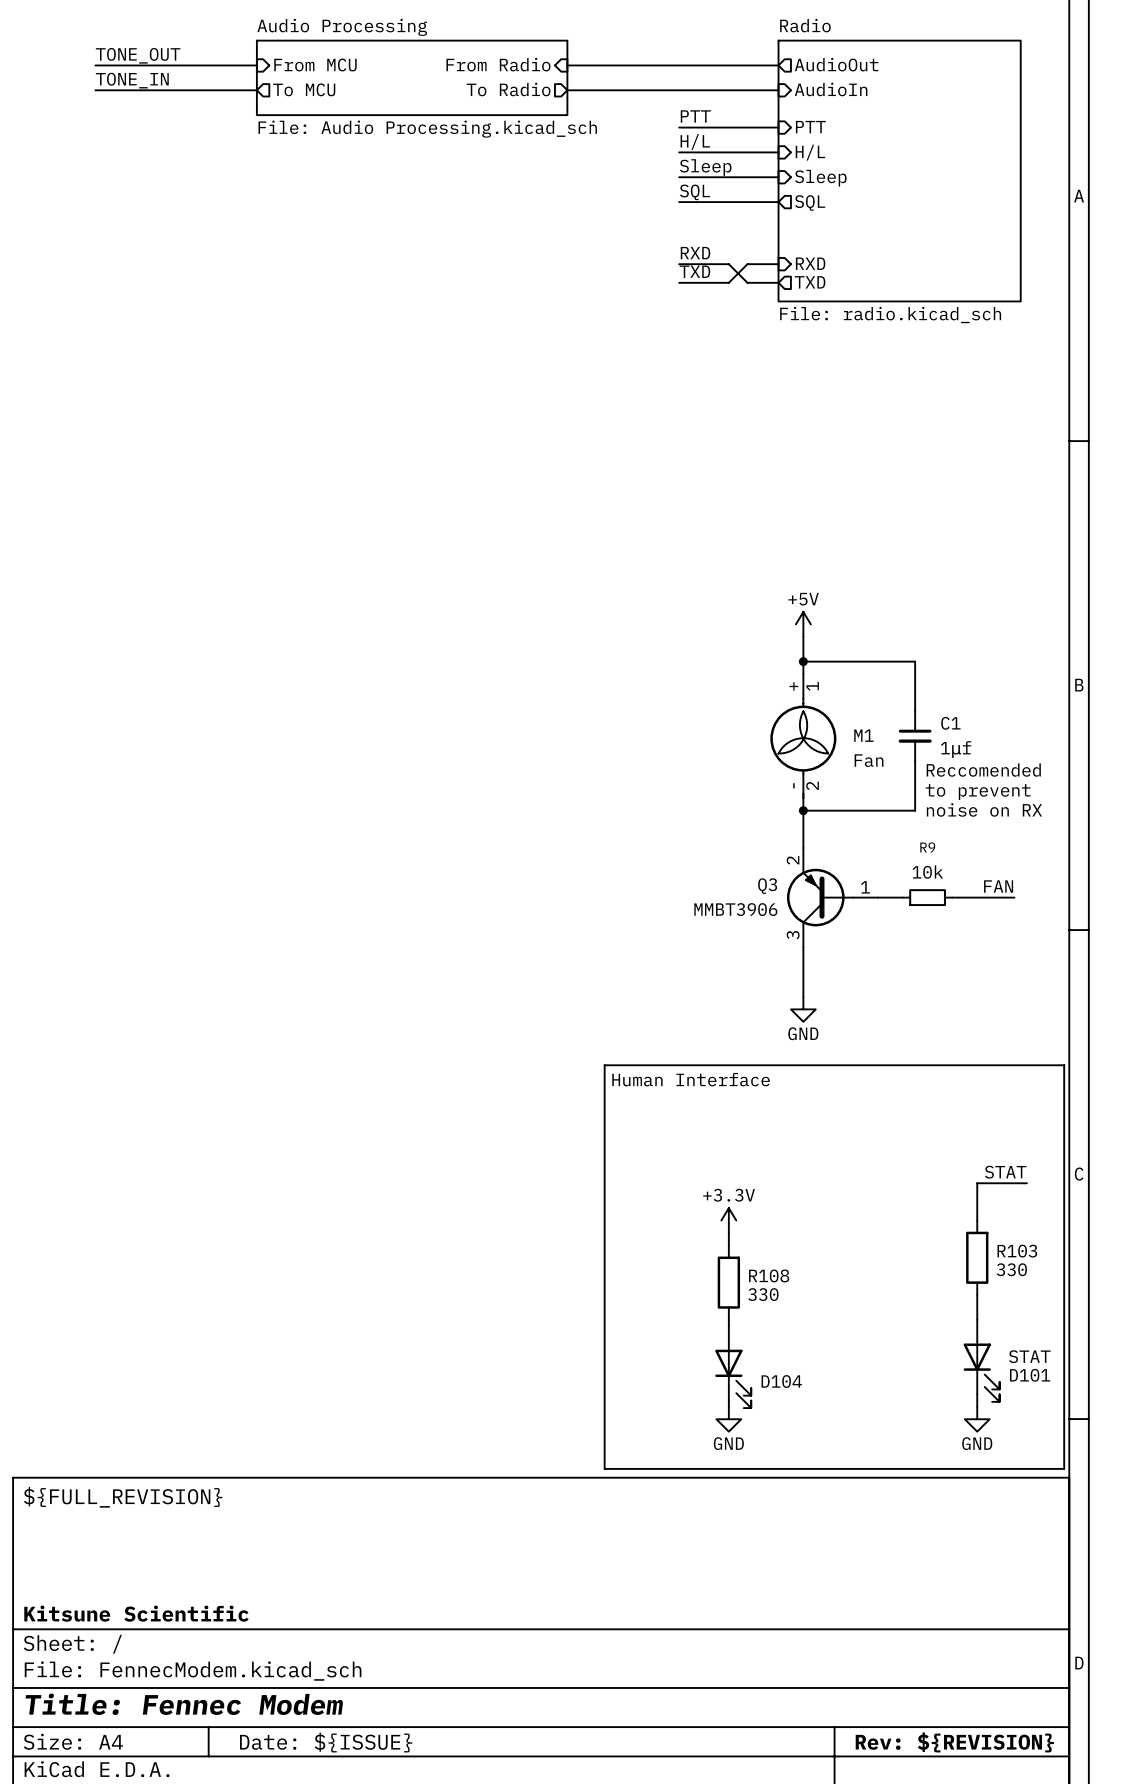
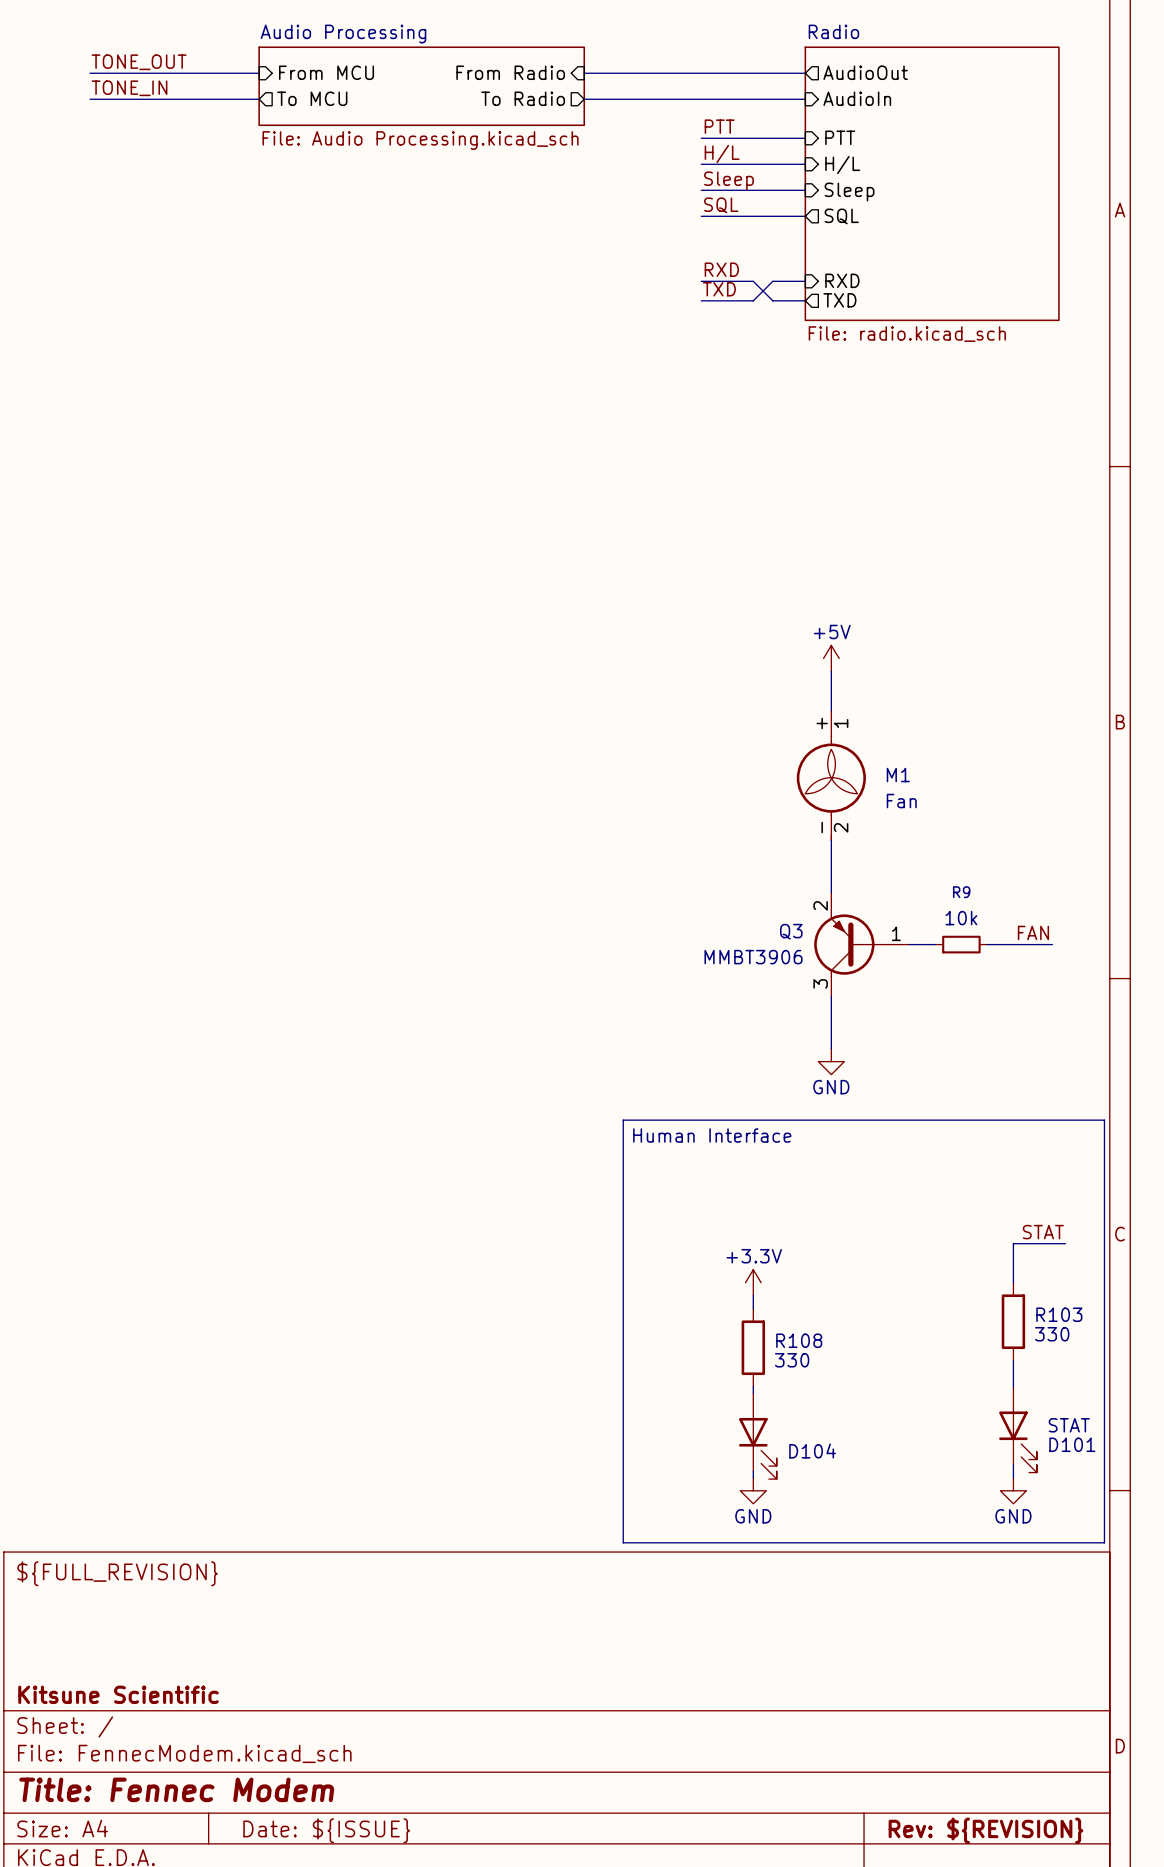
wire: (803, 661) (915, 661) (915, 711) -> none
junction: (803, 661) -> none
C1: 1μf (915, 736) -> none
wire: (915, 760) (915, 810) (803, 810) -> none
text: Reccomended (983, 770) -> none
text: to prevent (978, 792) -> none
text: noise on RX (984, 809) -> none
junction: (803, 810) -> none

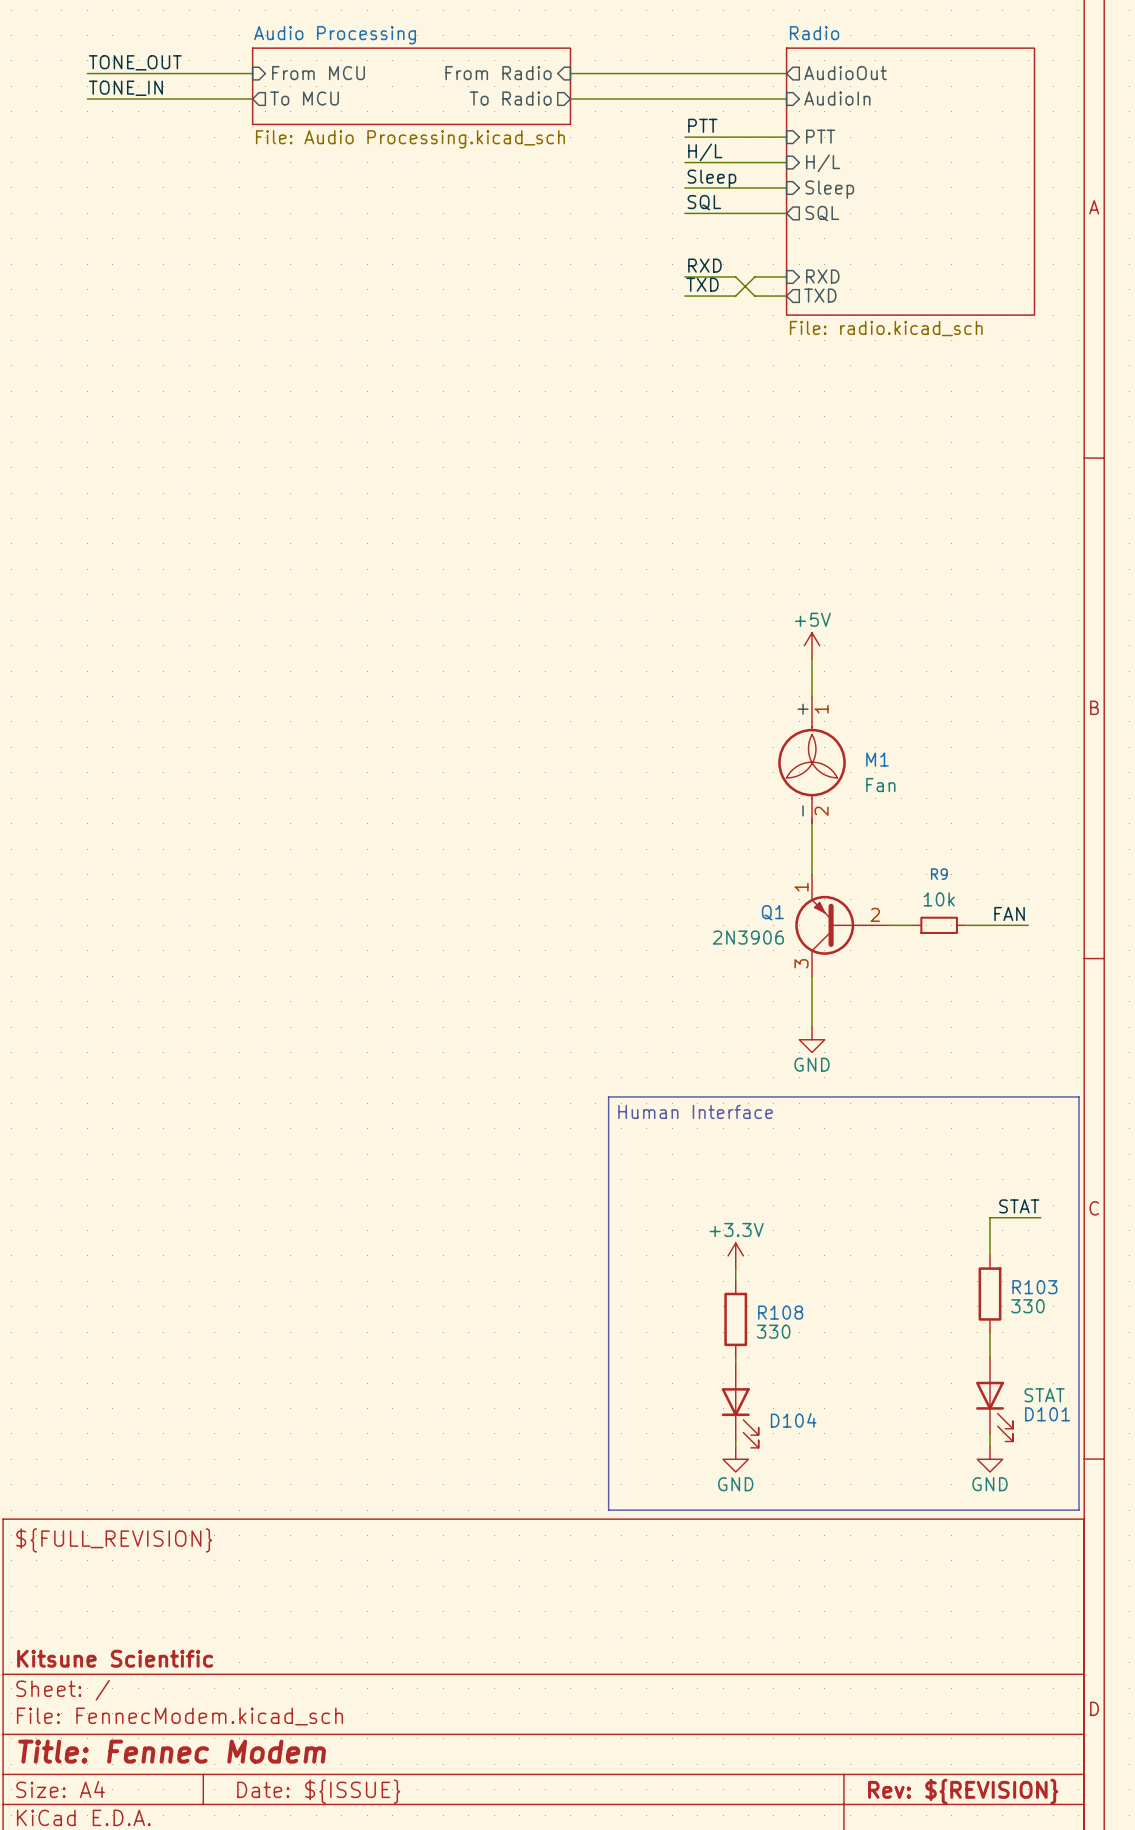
Q3 pin number: 2 (820, 905) -> 1 (801, 887)
Q3 name: Q3 (791, 931) -> Q1 (772, 912)
Q3 pin number: 1 (896, 933) -> 2 (875, 914)
Q3 value: MMBT3906 (753, 957) -> 2N3906 (748, 937)

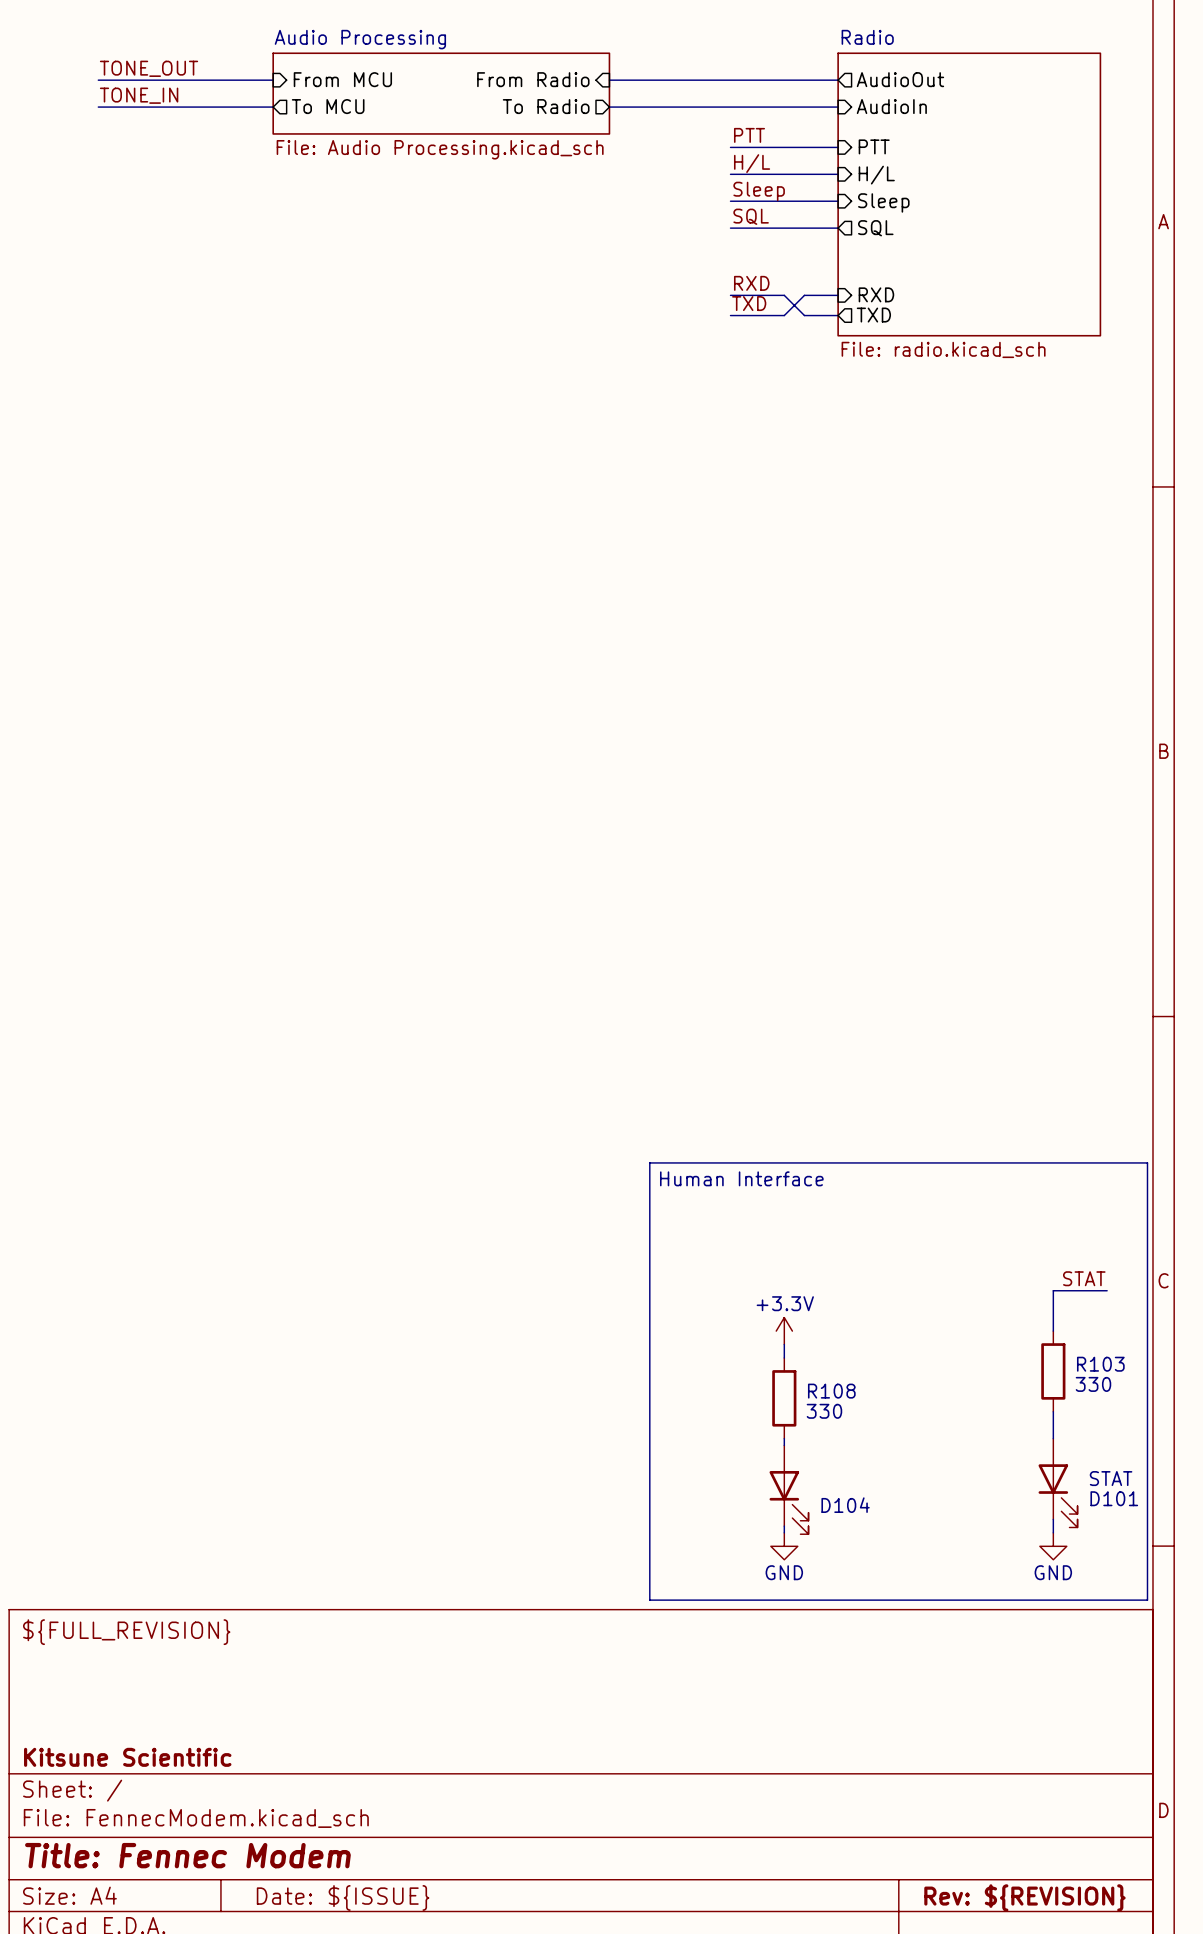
power symbol: +5V (812, 645) -> none
wire: (812, 658) (812, 696) -> none
M1: Fan (812, 760) -> none
wire: (812, 823) (812, 874) -> none
label: FAN (1009, 913) -> none
Q1: 2N3906 (841, 925) -> none
wire: (888, 925) (913, 925) -> none
R9: 10k (939, 925) -> none
wire: (964, 925) (1028, 925) -> none
wire: (812, 976) (812, 1027) -> none
power symbol: GND (812, 1039) -> none

